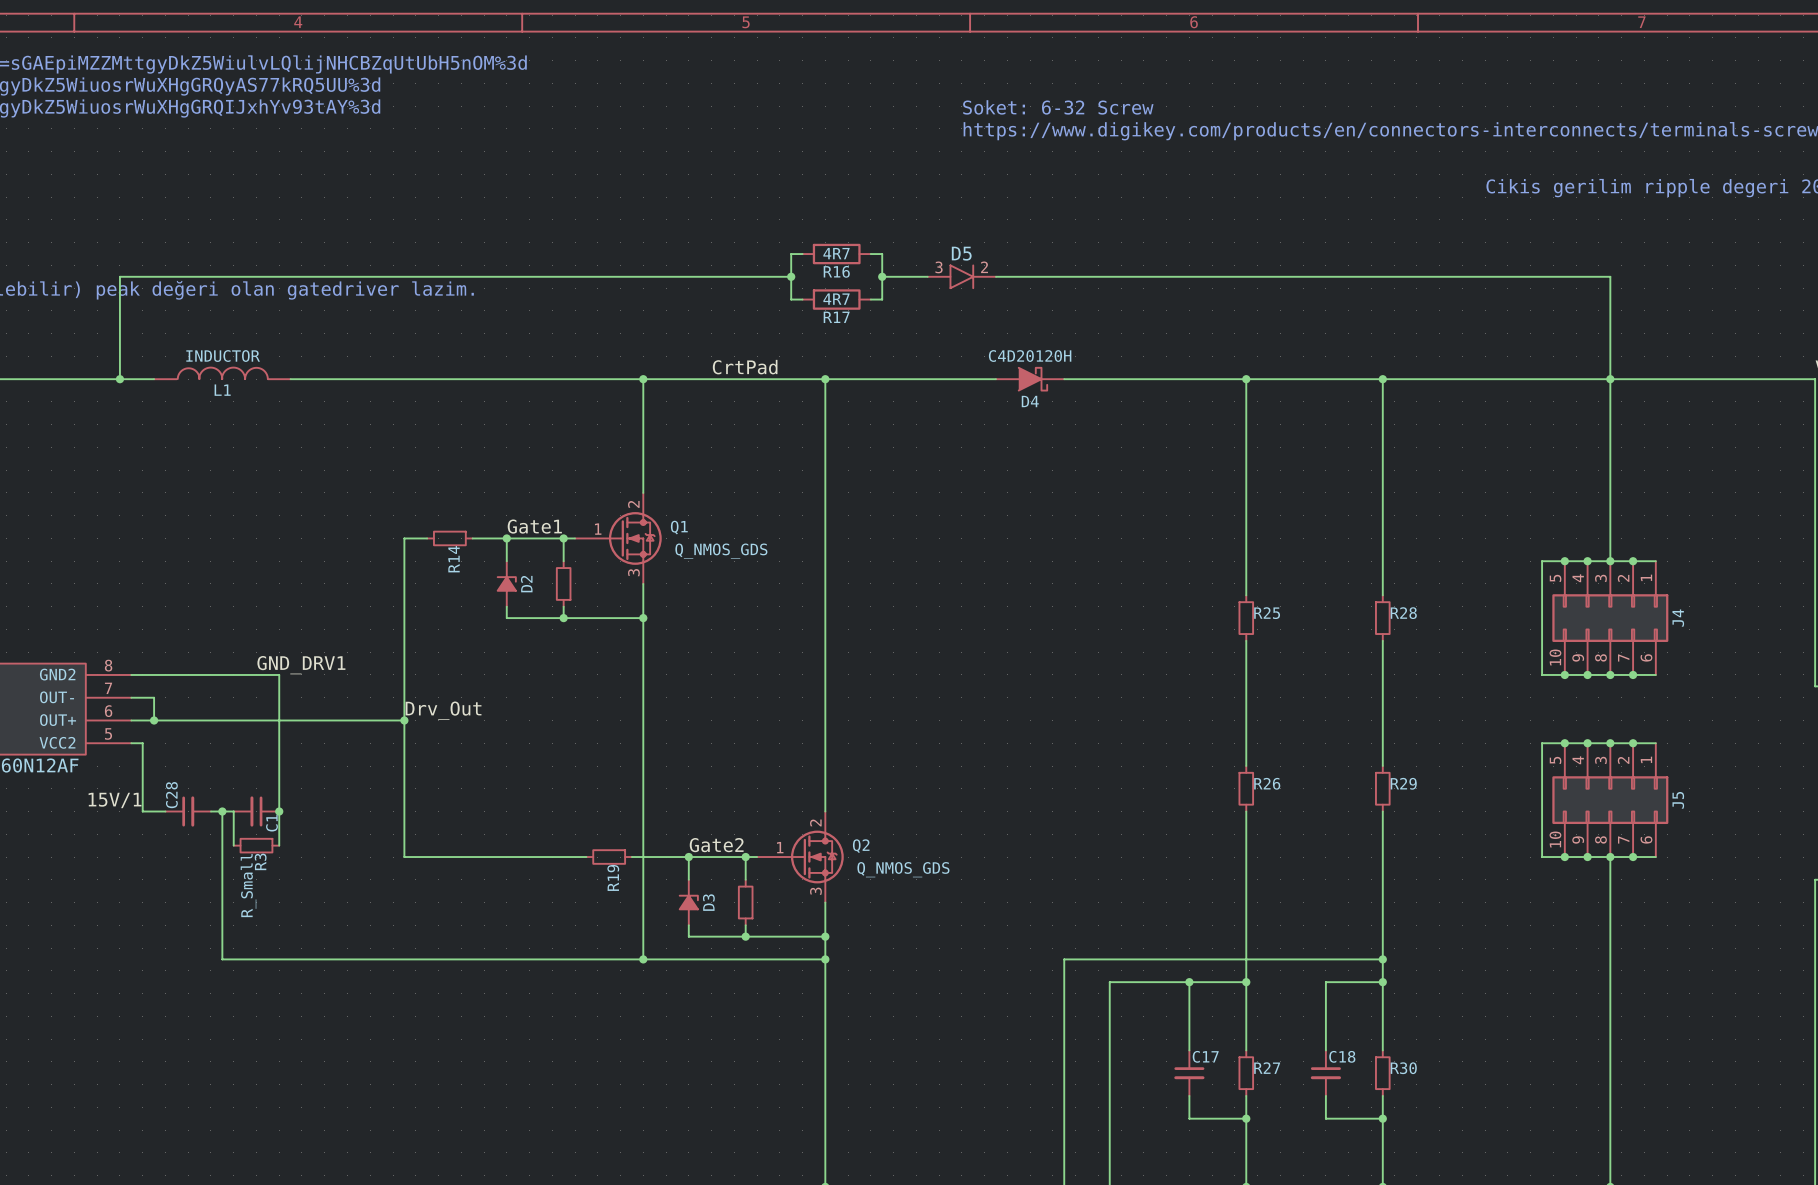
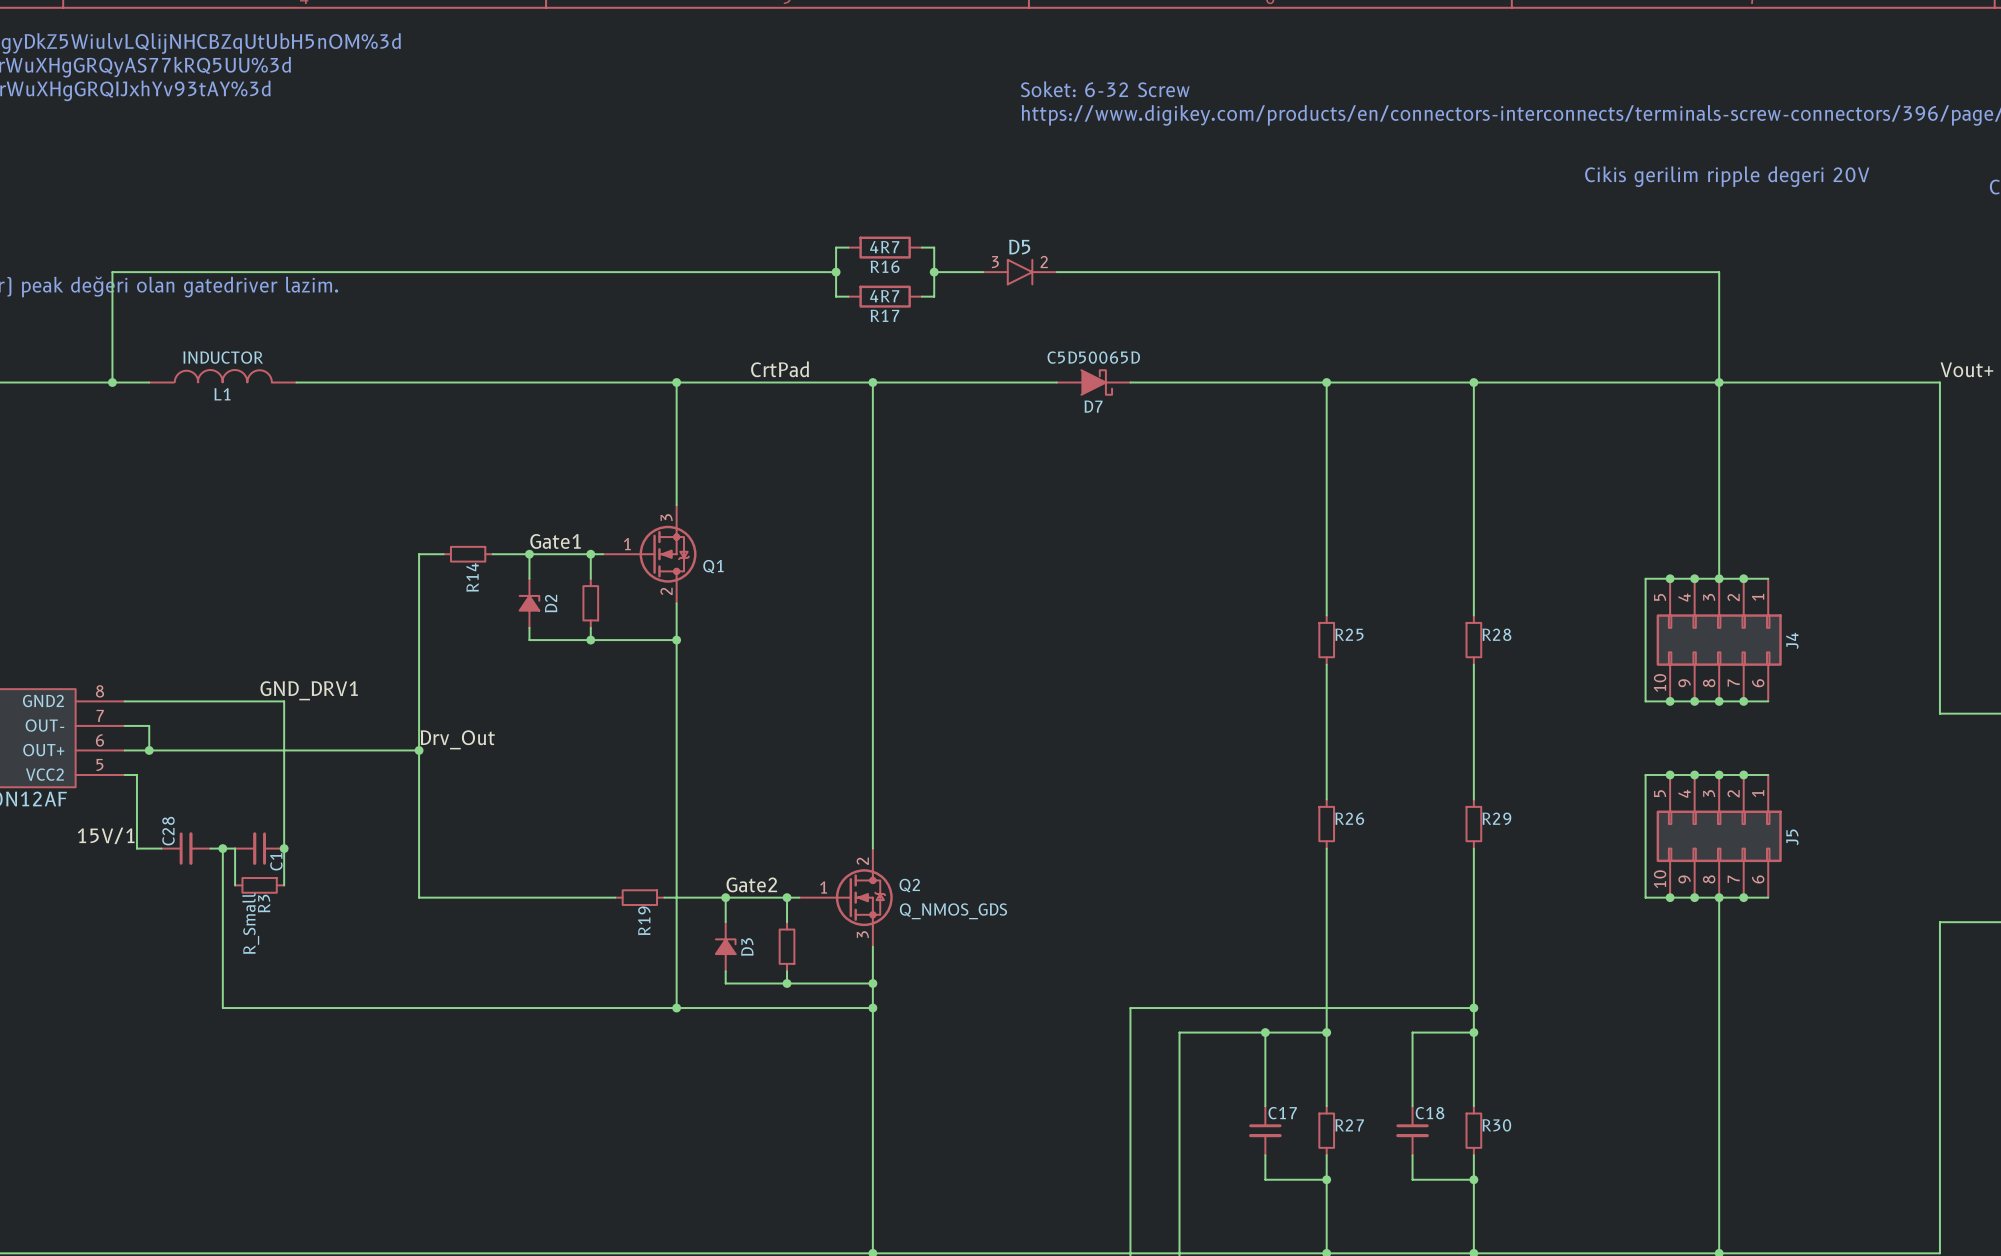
D4 value: C4D20120H (1030, 356) -> C5D50065D (1093, 357)
D4 name: D4 (1030, 401) -> D7 (1093, 406)
Q1 flip: as is (635, 538) -> up-down (668, 554)
Q1 value: Q_NMOS_GDS (721, 551) -> none

